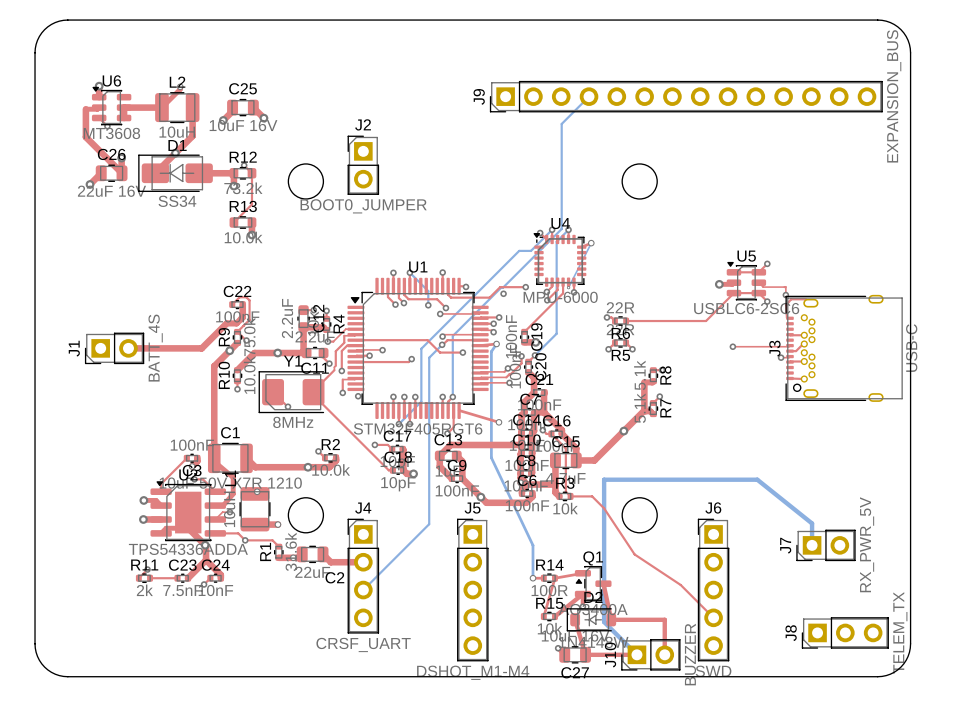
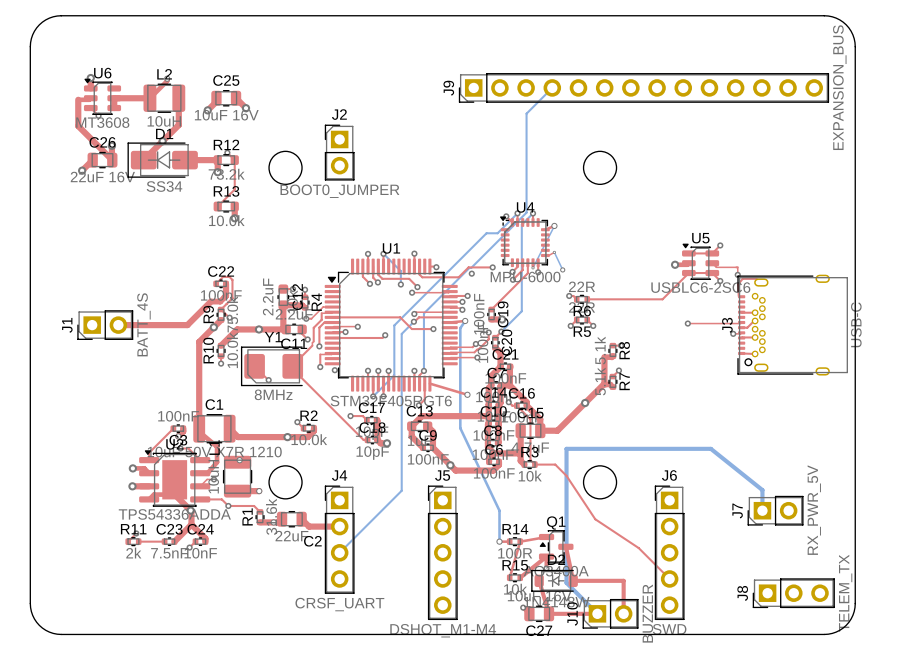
top track: none -> (554, 252) (548, 255)
bottom track: none -> (554, 252) (562, 269)
via: none -> (554, 252)
via: none -> (562, 269)

